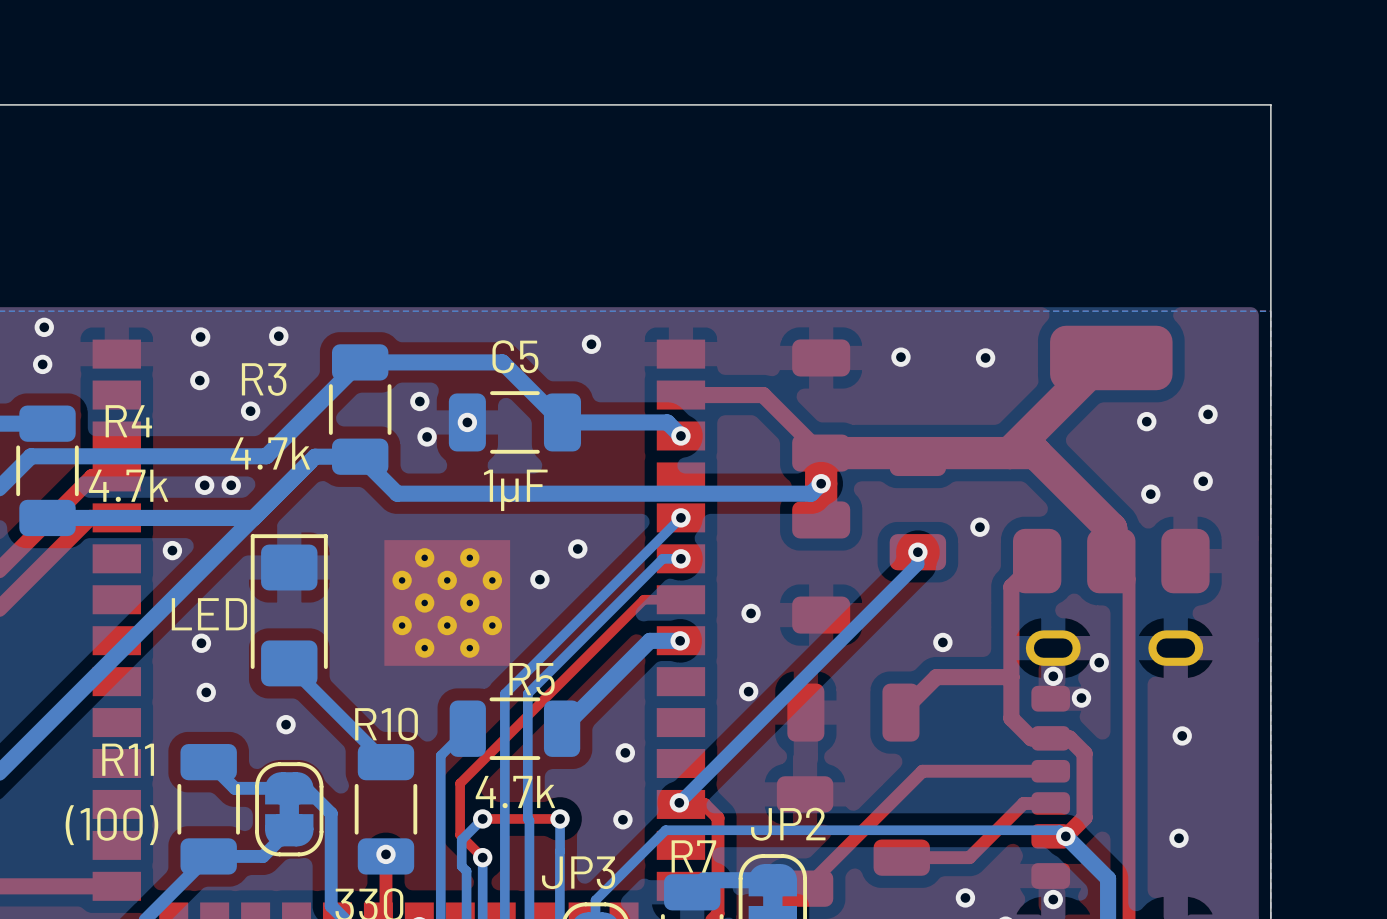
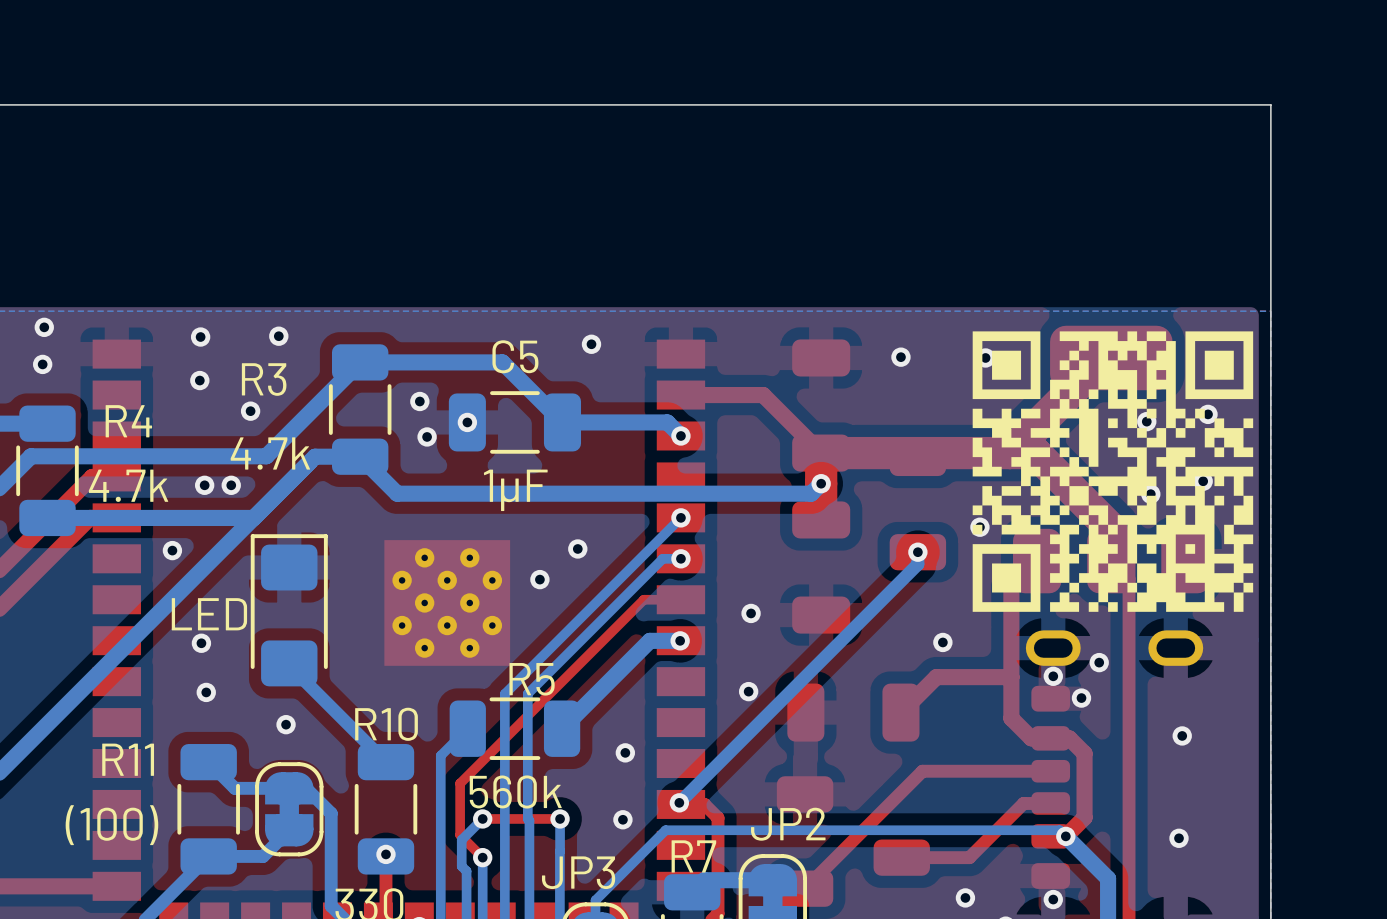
drawing: none -> [972, 331, 1254, 612]
R5 value: 4.7k (515, 792) -> 560k (515, 791)

